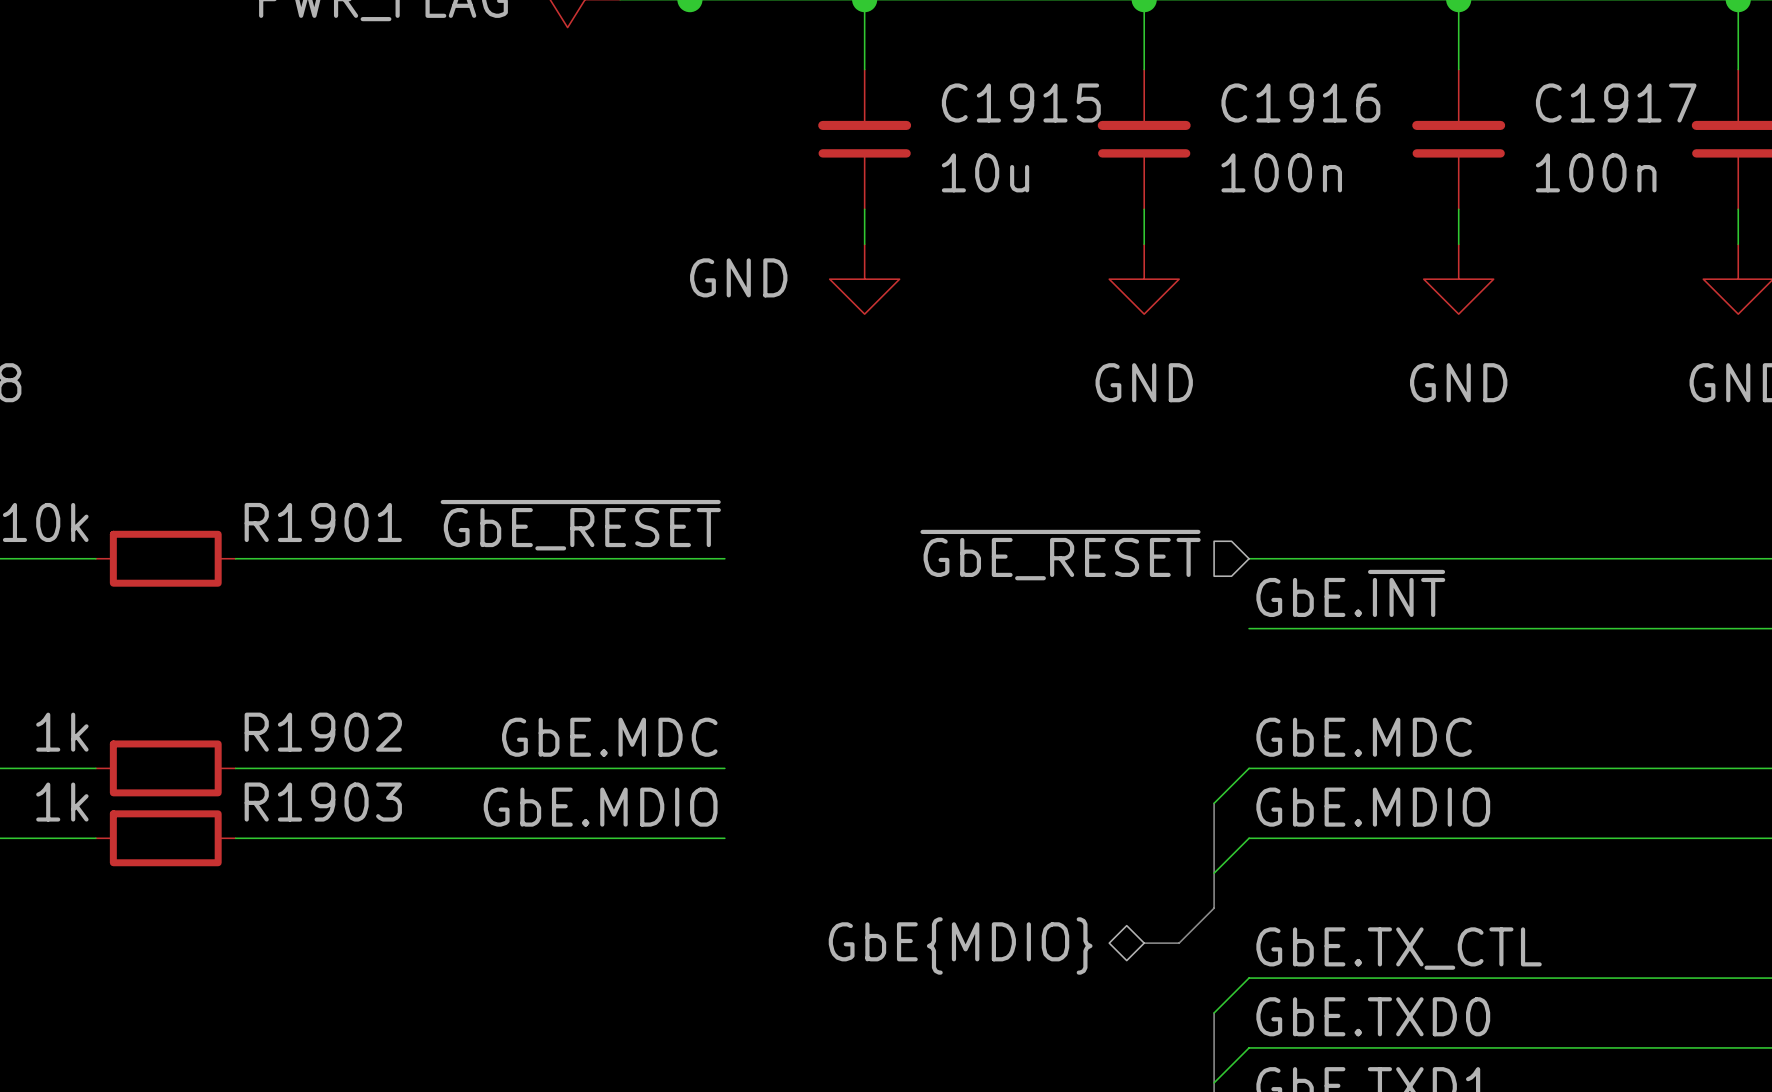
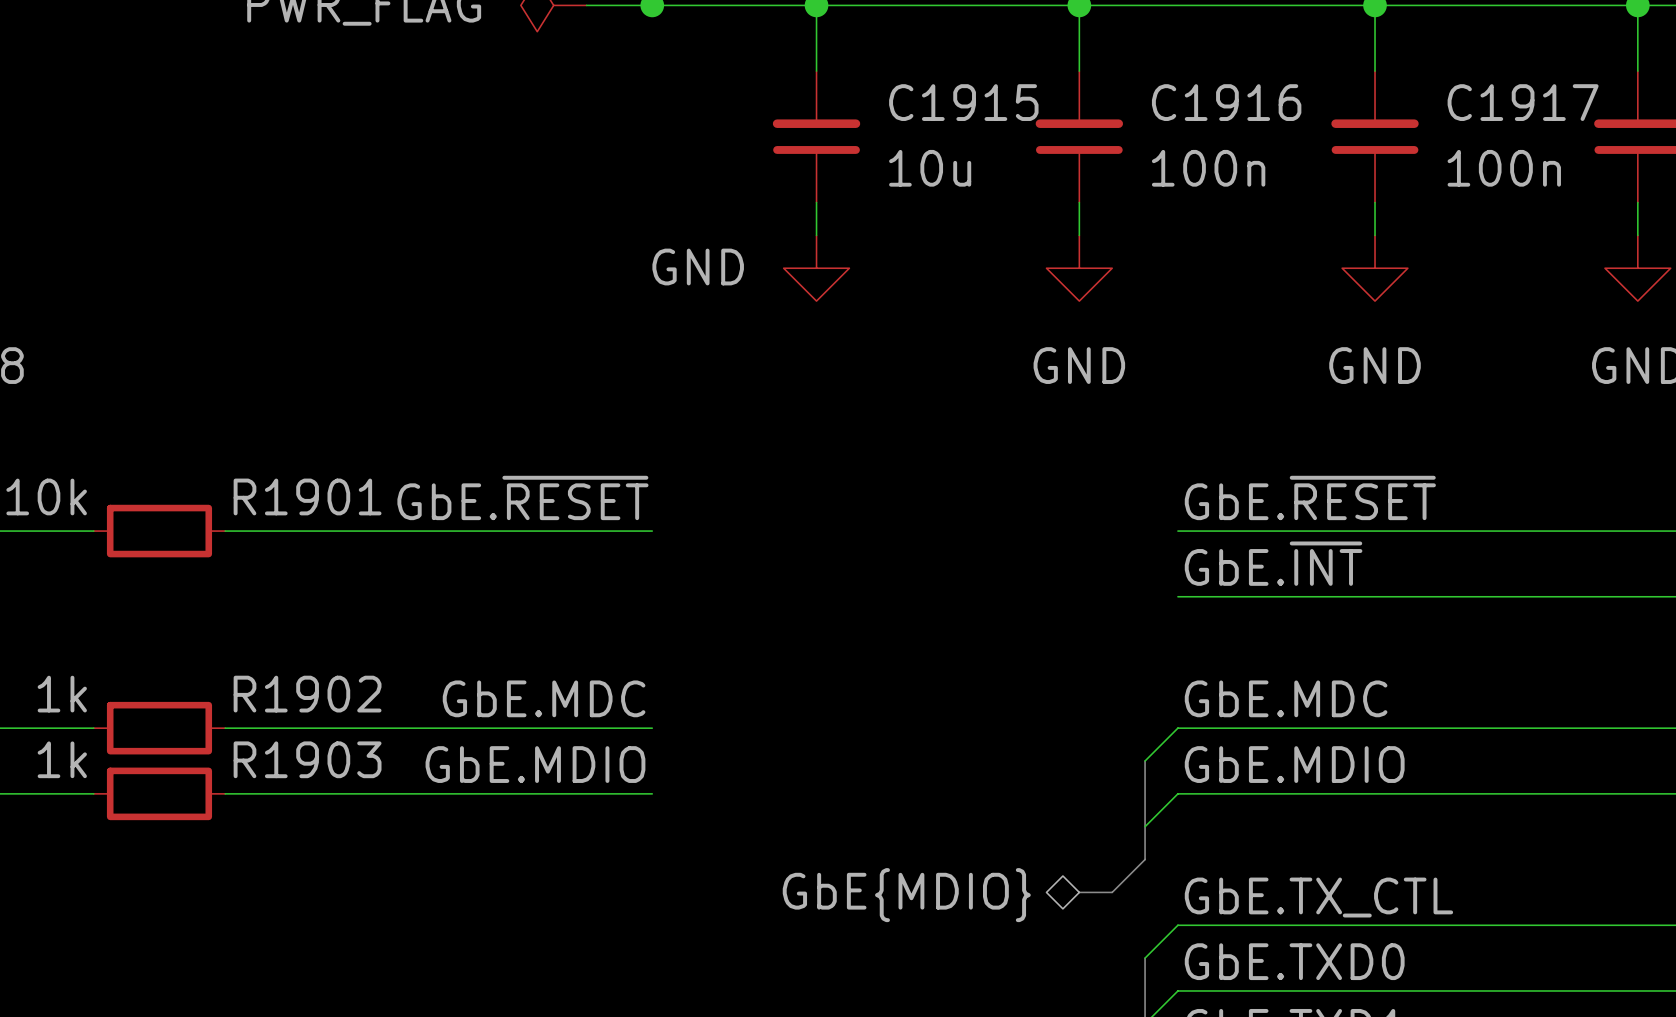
label: none -> GbE.~{RESET} (1310, 497)
label: ~{GbE_RESET} (580, 525) -> GbE.~{RESET} (522, 497)
hierarchical label: ~{GbE_RESET} (1060, 555) -> none
wire: (689, 558) (724, 558) -> none
label position: GbE.MDC (609, 737) -> GbE.MDC (544, 698)
wire: (689, 768) (724, 768) -> none
label position: GbE.MDIO (600, 807) -> GbE.MDIO (535, 764)
wire: (689, 838) (724, 838) -> none

